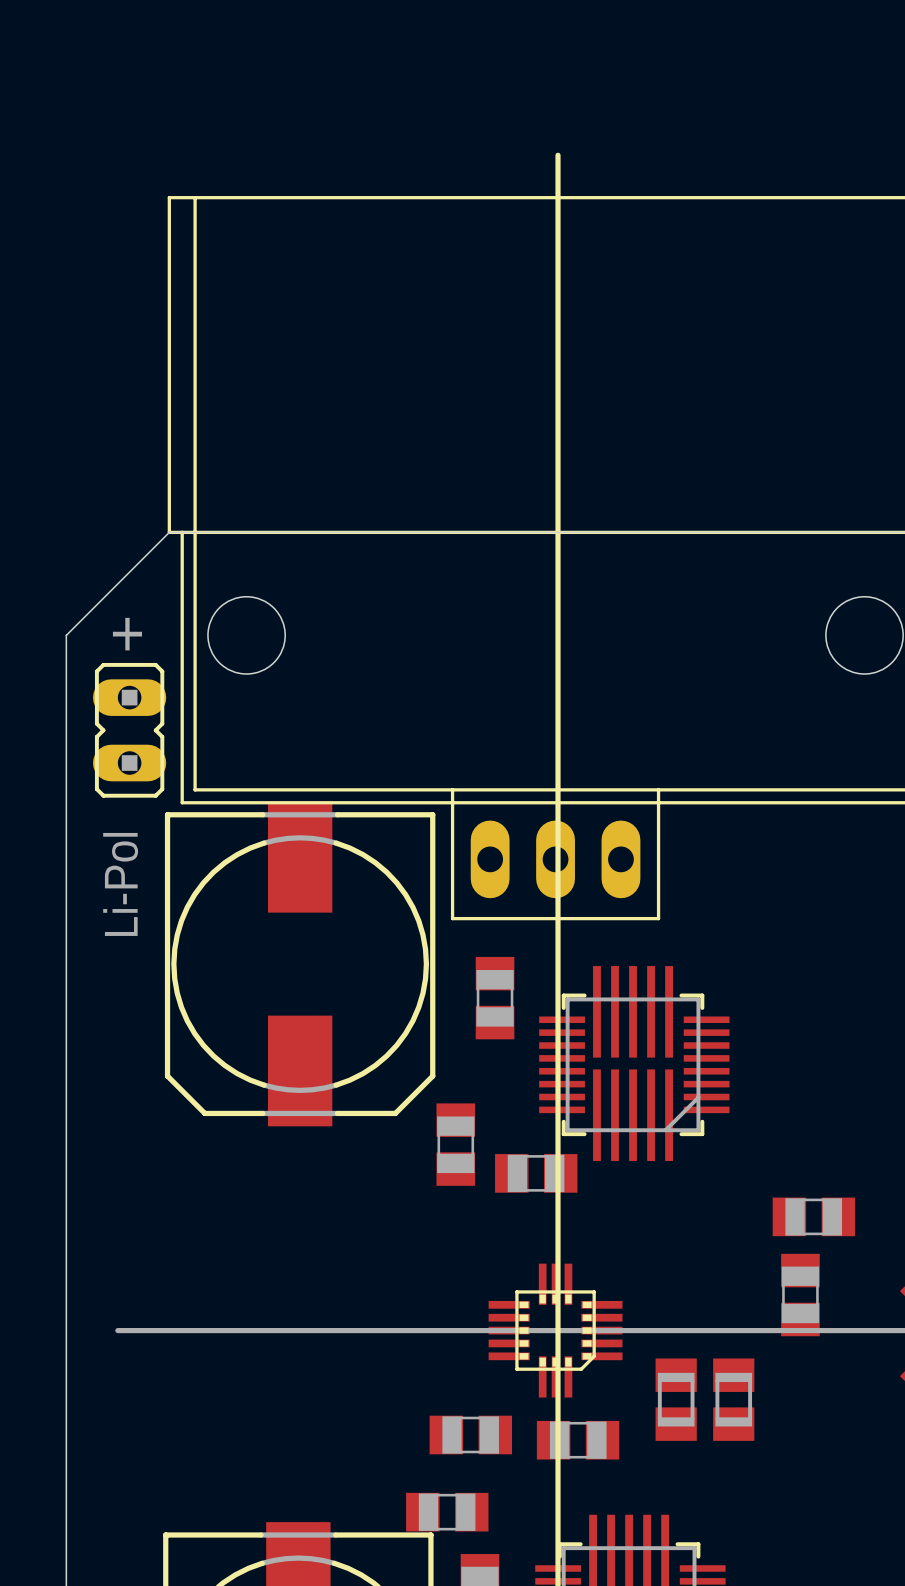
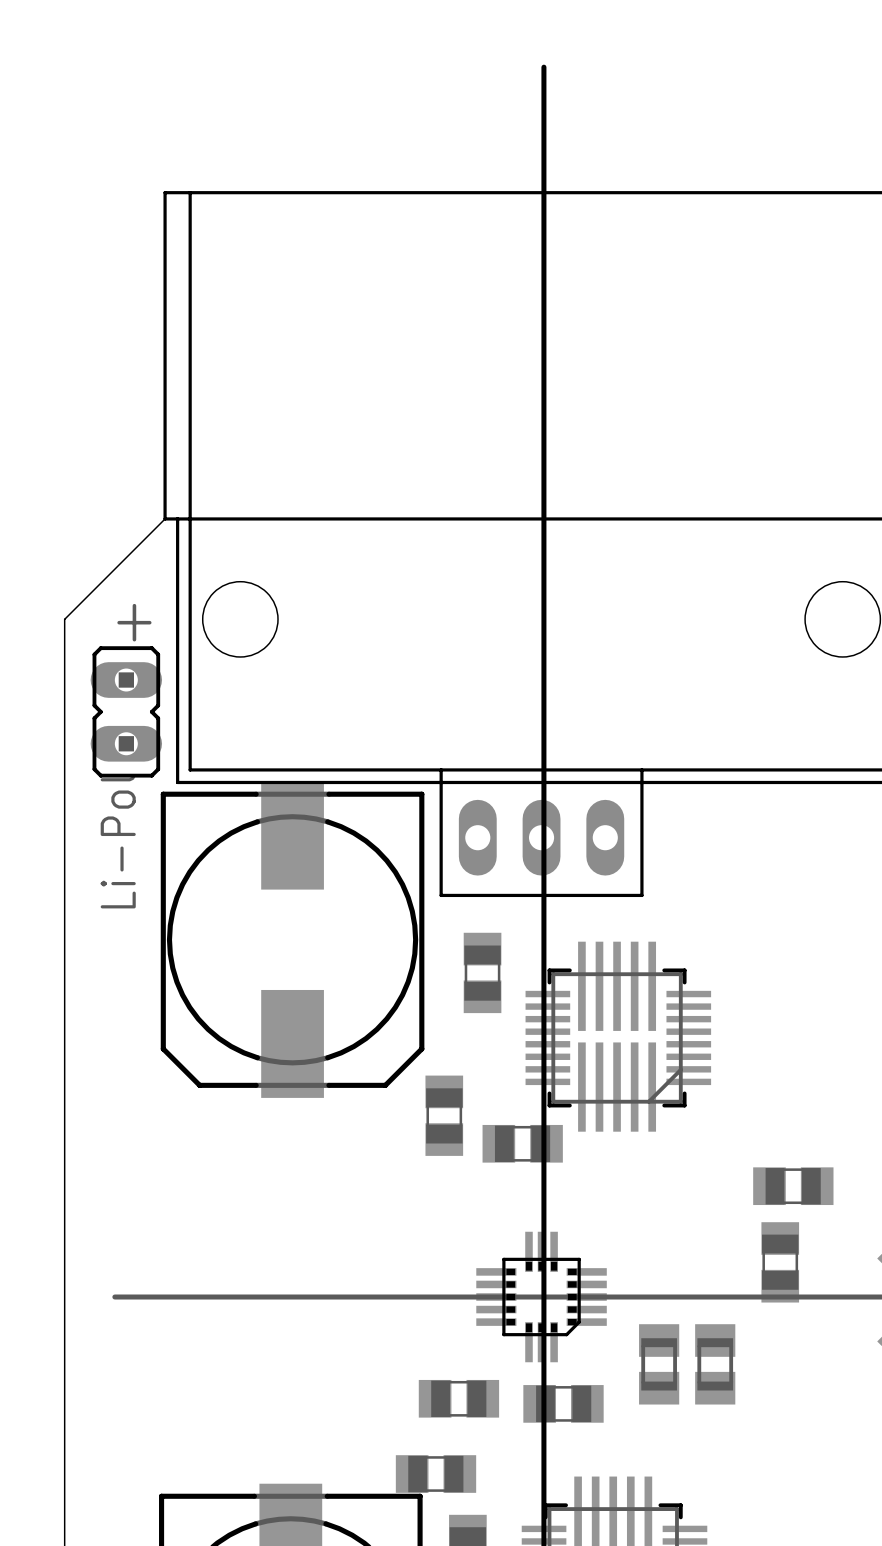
line: none -> (543, 67) (543, 151)

